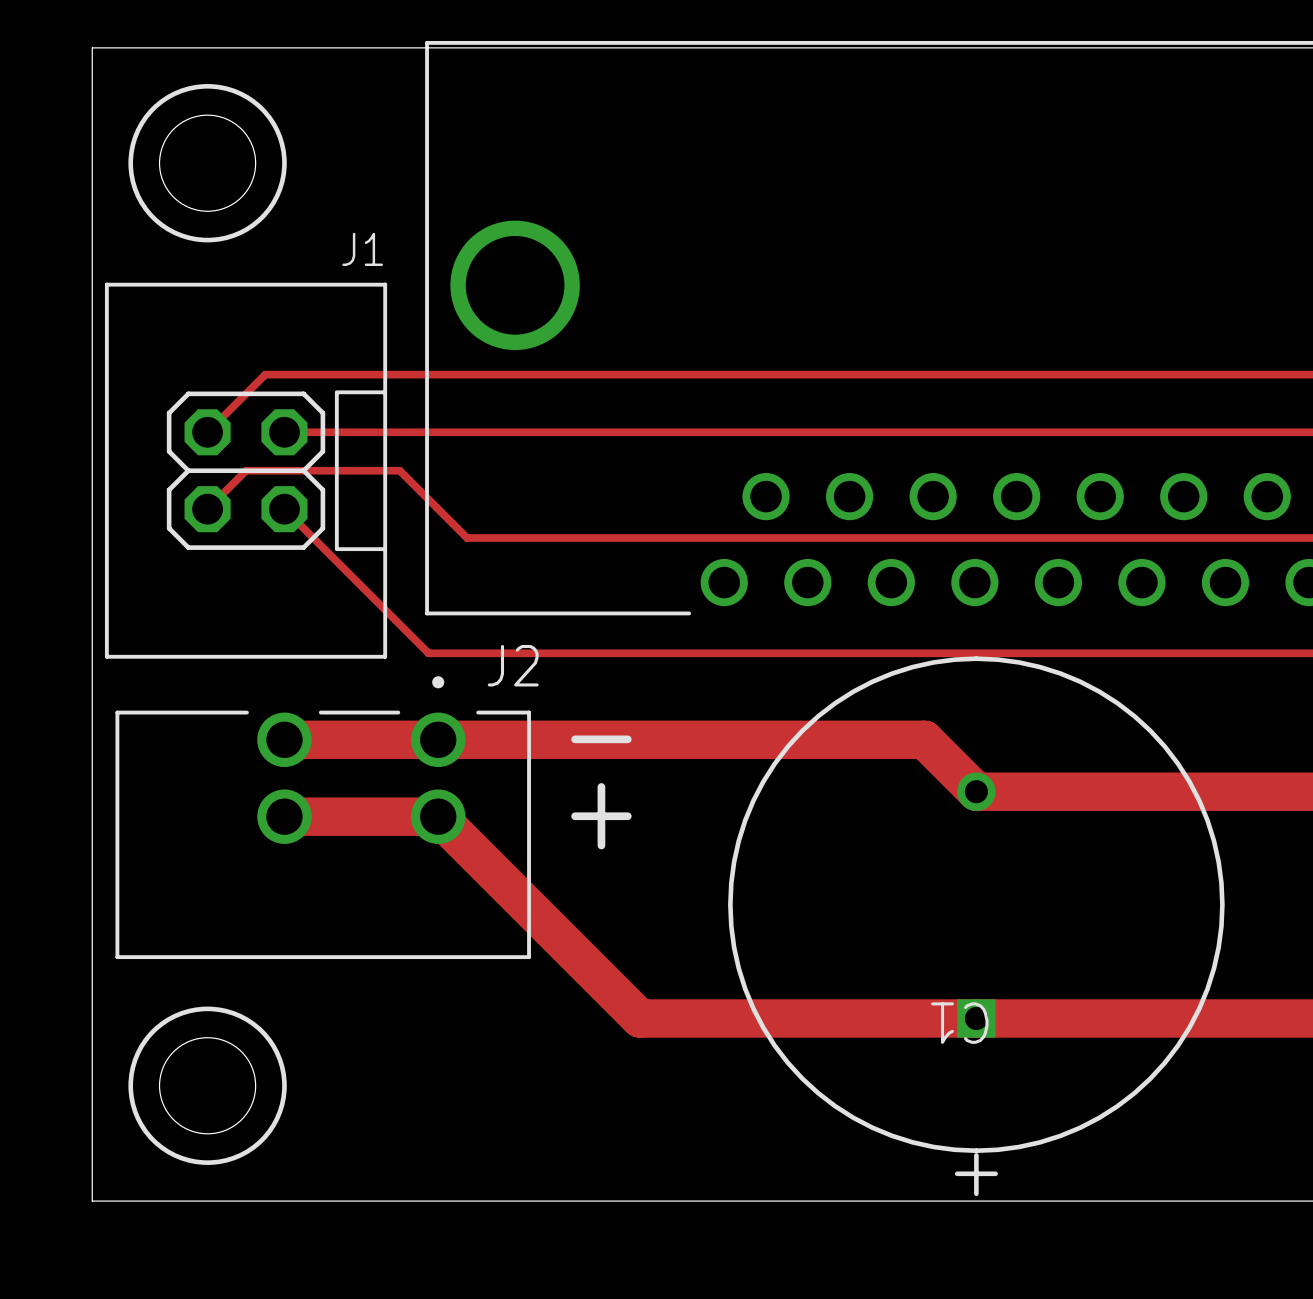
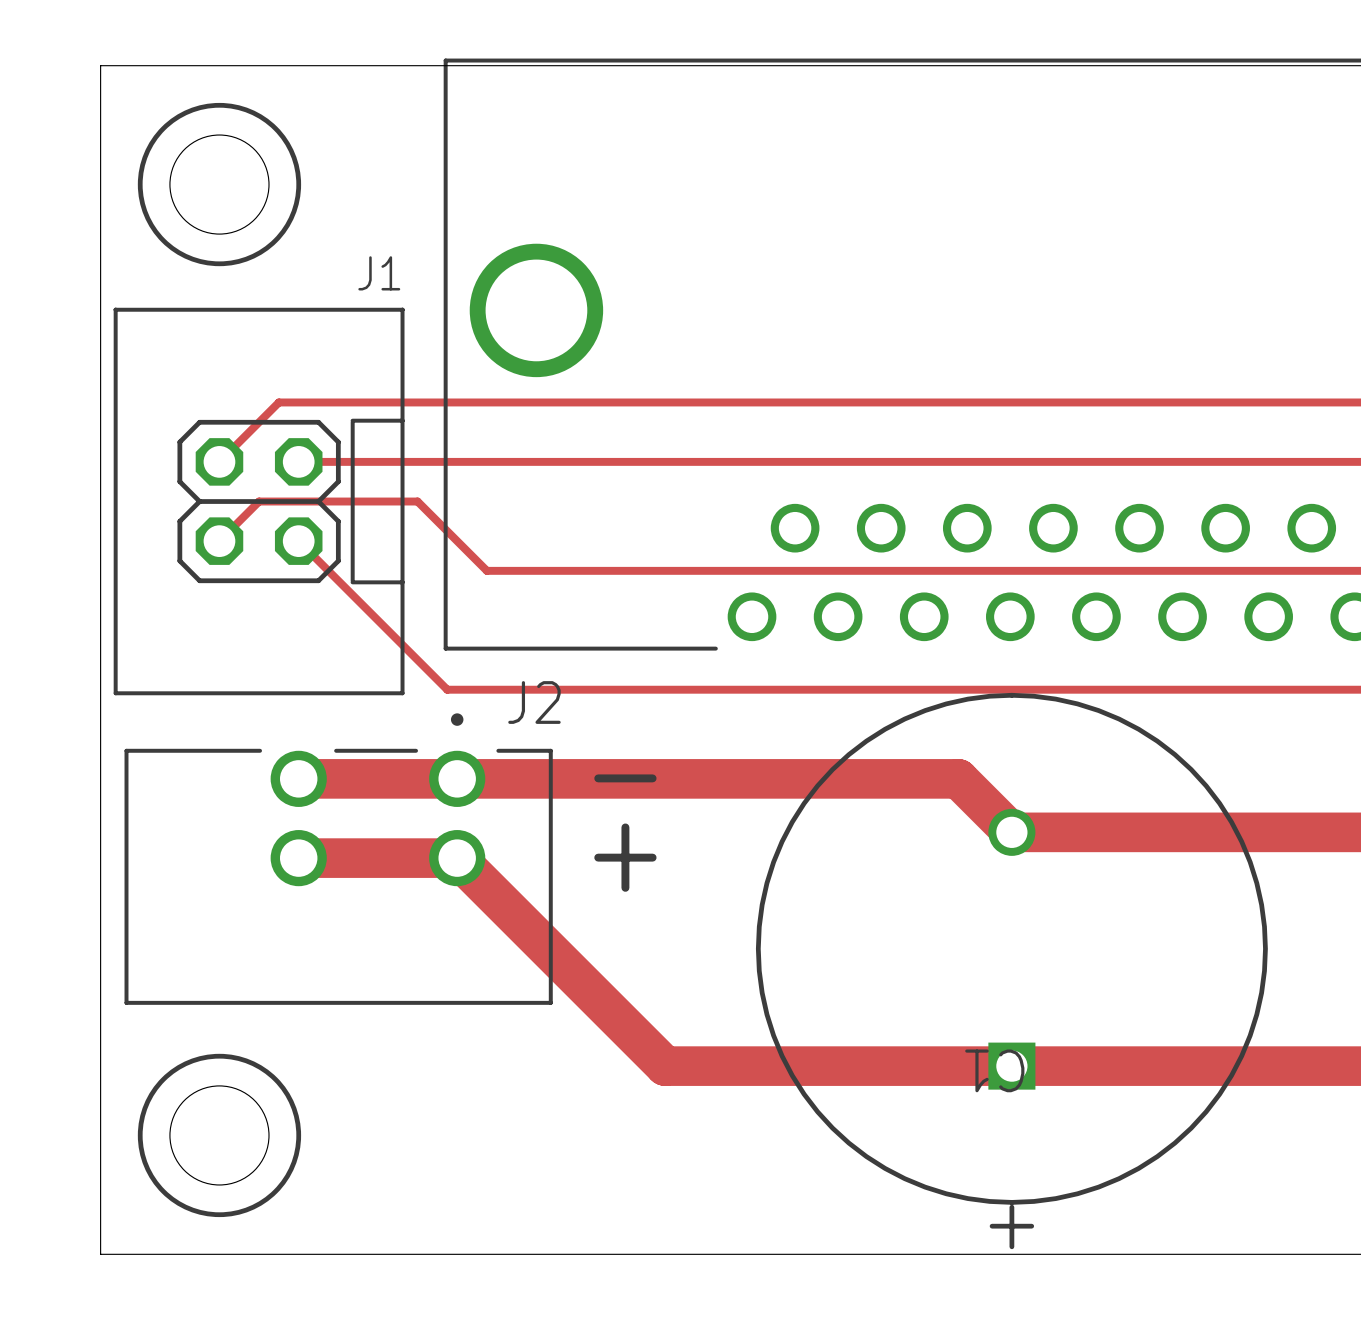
C1 footprint: [728, 656, 1225, 1197] -> [755, 692, 1268, 1250]

